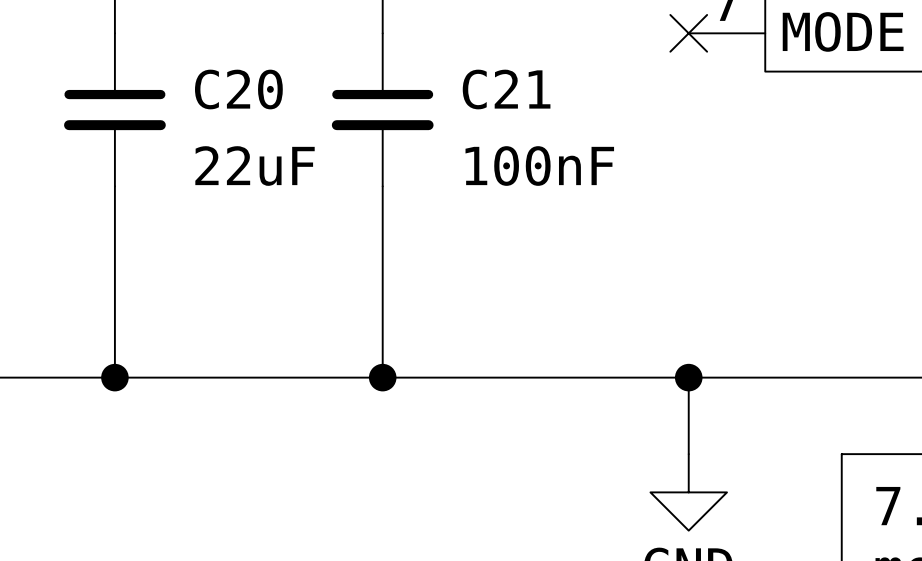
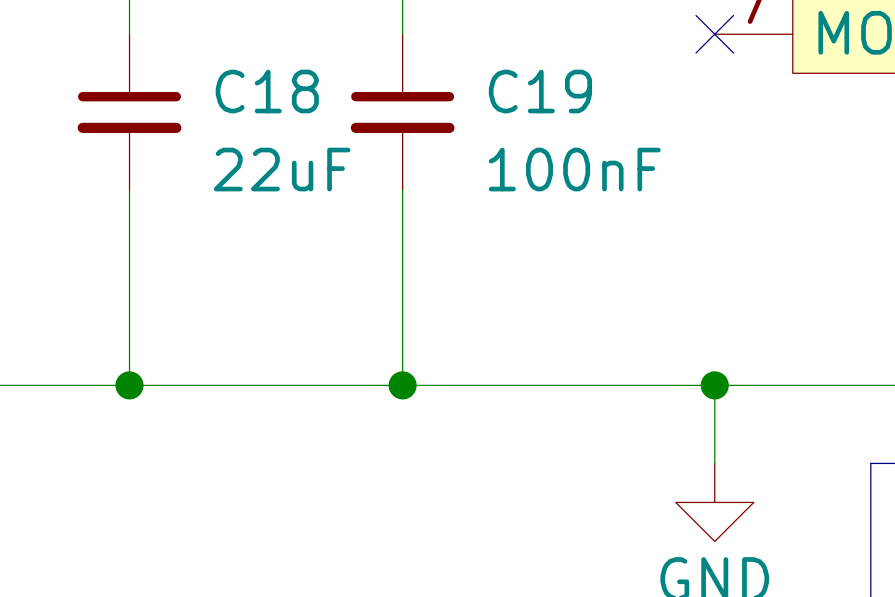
C20 name: C20 (238, 89) -> C18 (267, 91)
C21 name: C21 (506, 89) -> C19 (540, 91)

